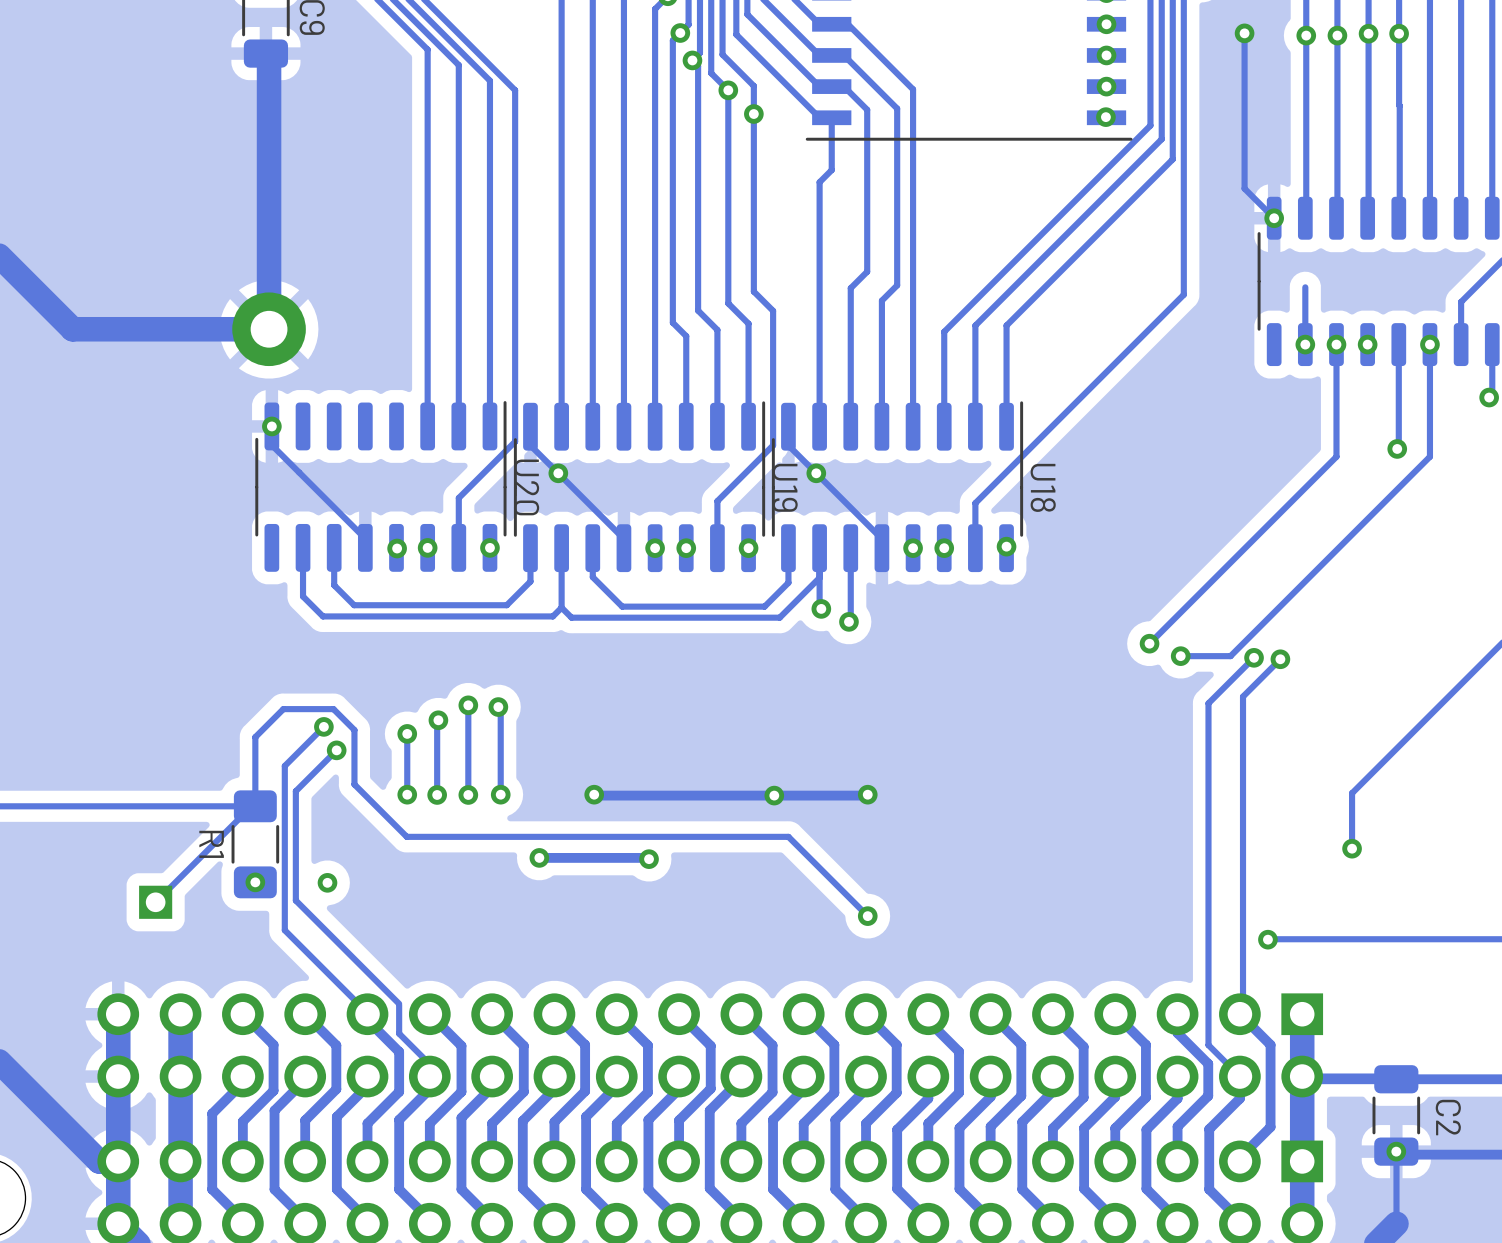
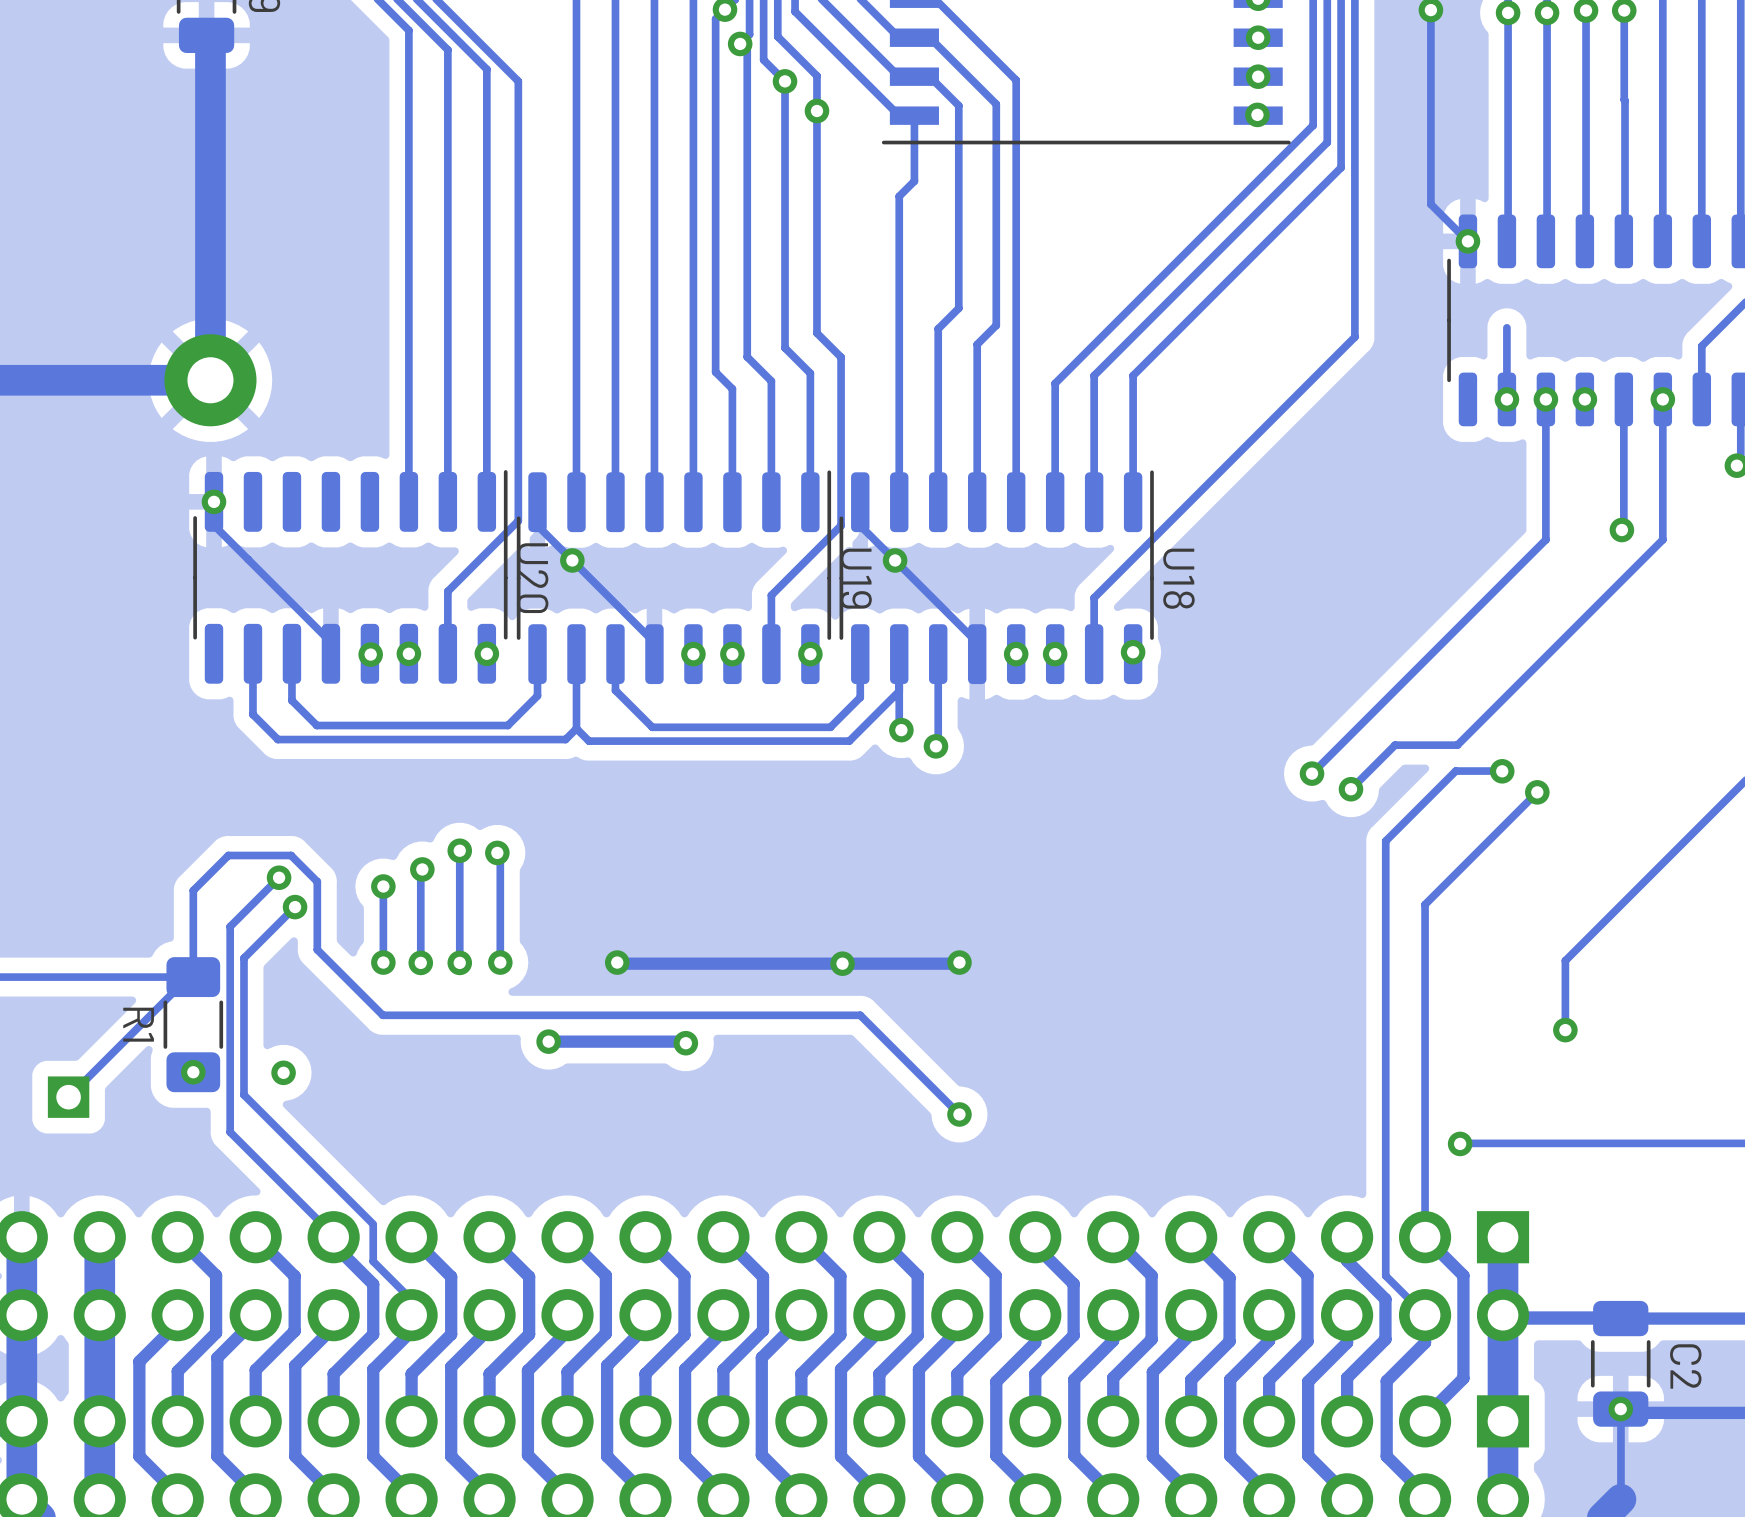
track: (1265, 620) (1230, 656) (1180, 656) -> (1457, 745) (1395, 745) (1350, 789)
via: none -> (1502, 771)
track: (1254, 657) (1208, 703) -> (1501, 771) (1455, 771) (1385, 841) (1385, 848)
via: (1254, 657) -> none
via: none -> (1537, 792)
track: (1280, 659) (1243, 696) (1243, 1011) (1239, 1014) -> (1537, 792) (1425, 904) (1425, 1237)
via: (1280, 659) -> none

